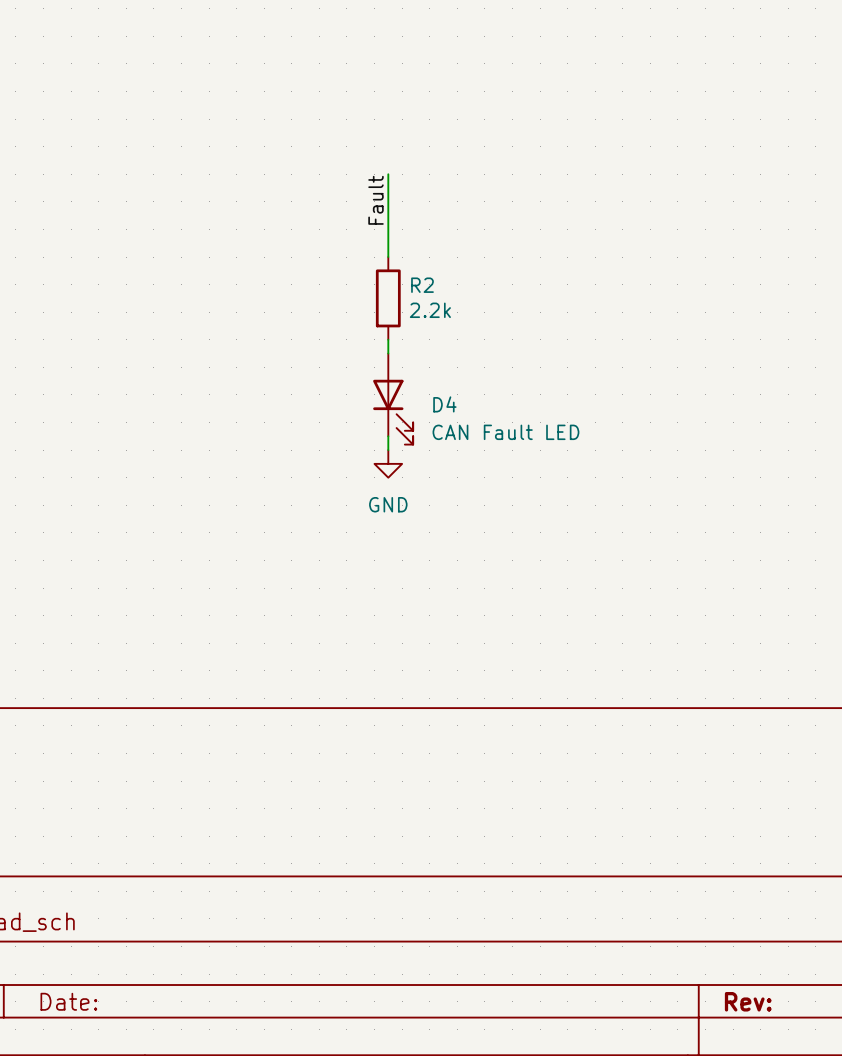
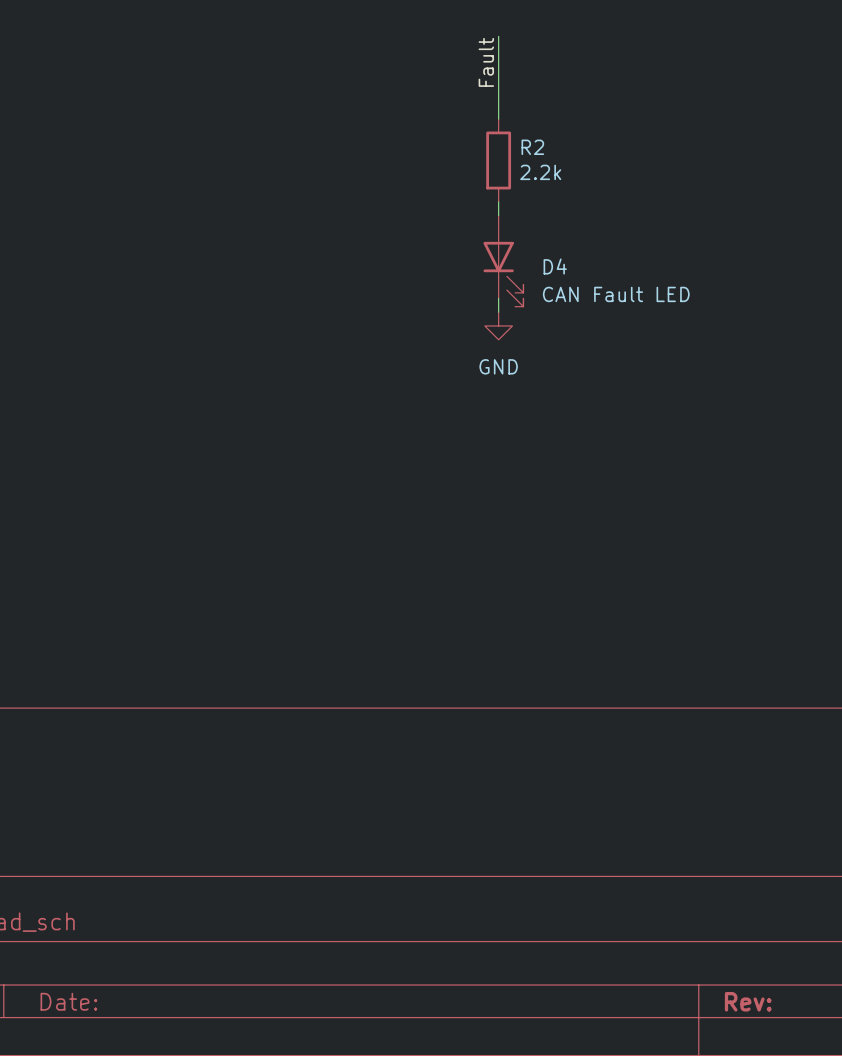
wire: (388, 174) (388, 257) -> (498, 36) (498, 119)
label position: Fault (376, 200) -> Fault (486, 62)
R2 position: (388, 298) -> (498, 160)
wire: (388, 339) (388, 353) -> (498, 201) (498, 215)
D4 position: (393, 399) -> (503, 261)
wire: (388, 436) (388, 450) -> (498, 298) (498, 312)
power symbol position: GND (388, 463) -> GND (498, 325)

